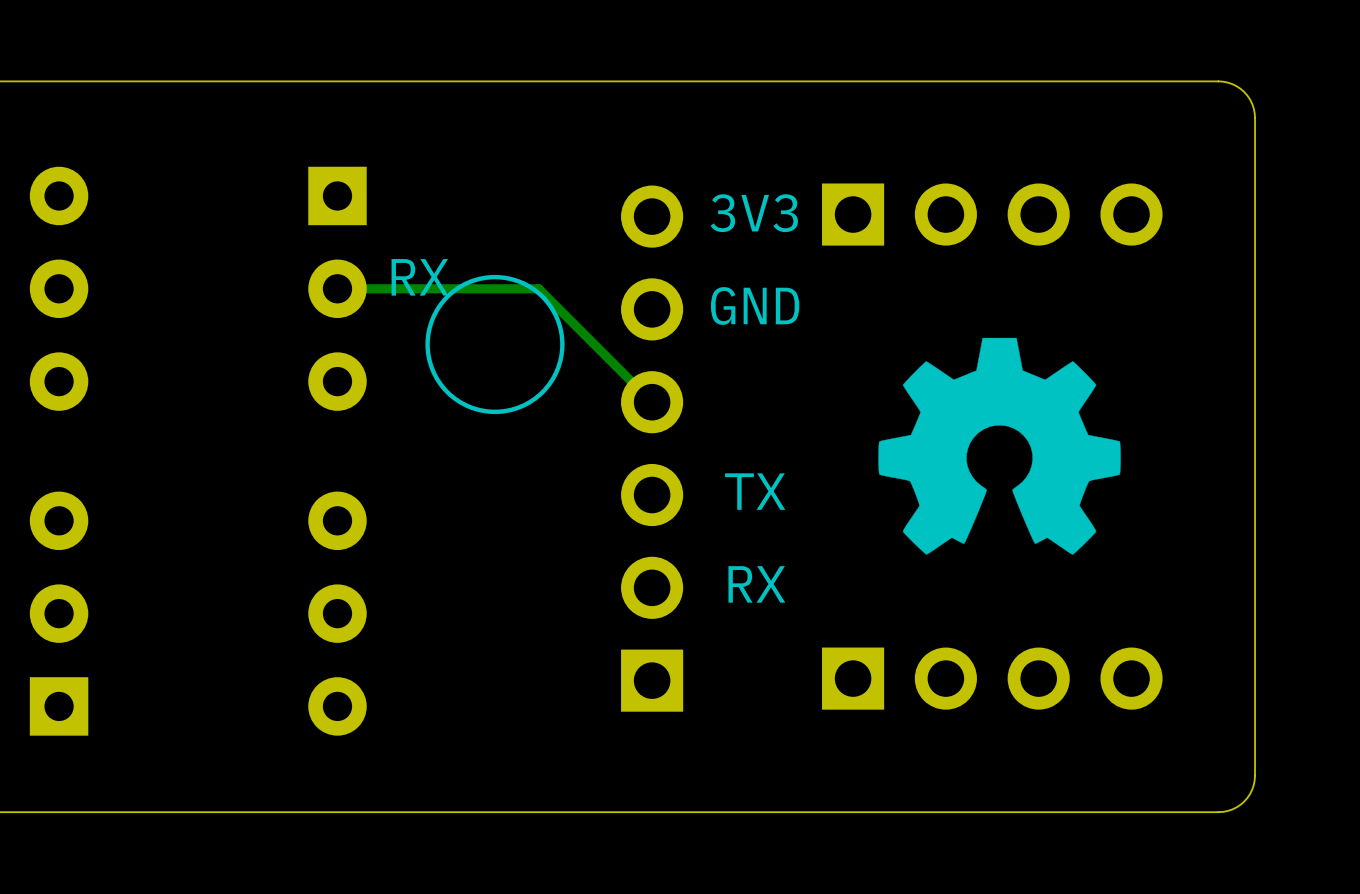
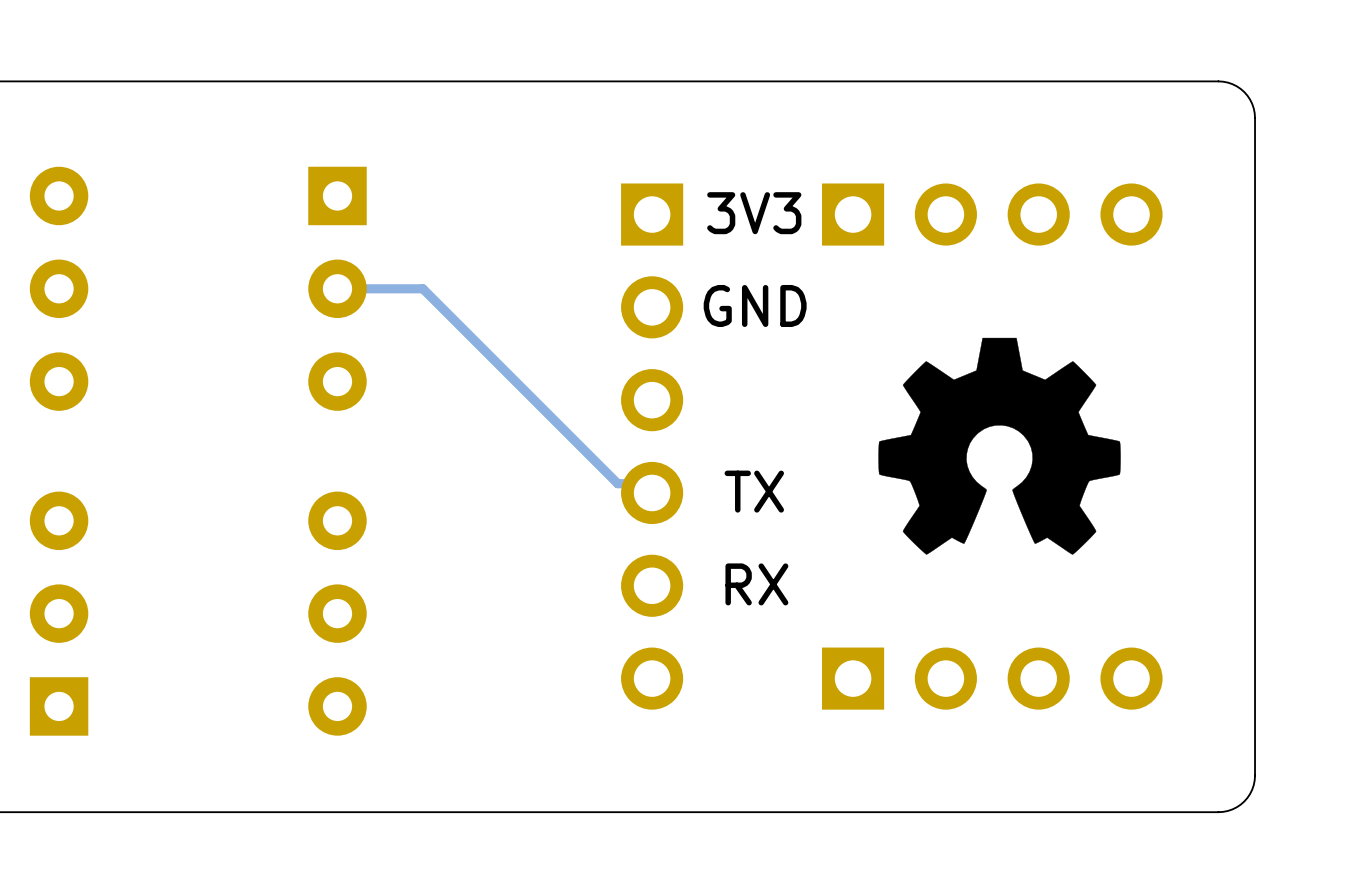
drawing: [425, 274, 565, 415] -> none
text: RX (419, 277) -> none
track: (422, 288) (538, 288) (652, 402) -> (422, 288) (617, 483) (662, 483)
part rotation: 0° (652, 448) -> 180° (652, 446)

